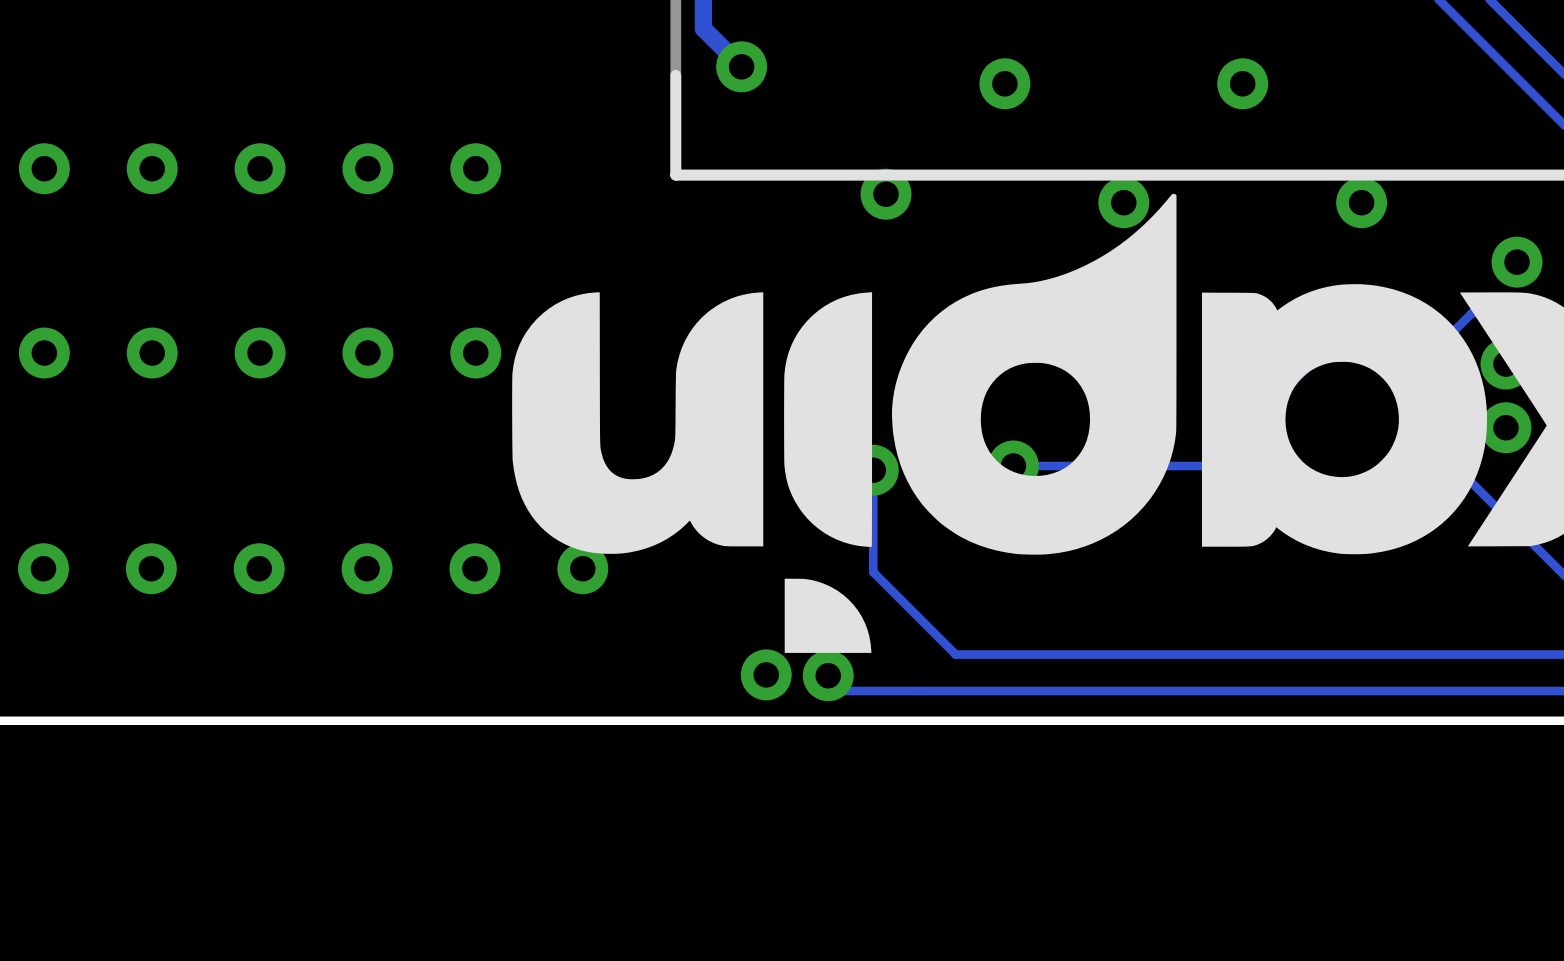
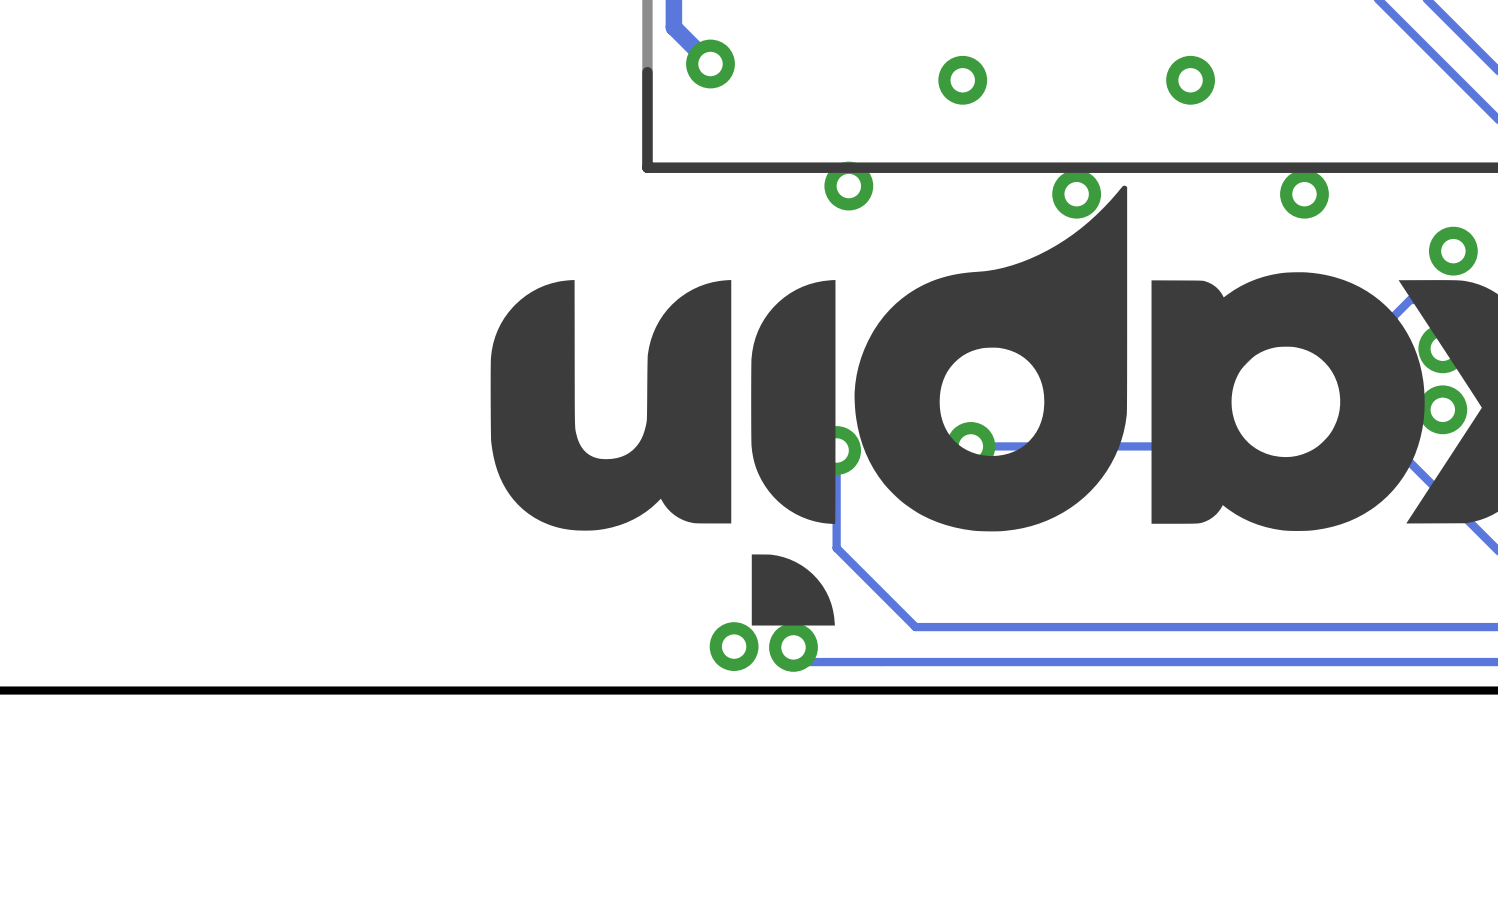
via: (44, 168) -> none
via: (152, 168) -> none
via: (260, 168) -> none
via: (367, 168) -> none
via: (475, 168) -> none
via: (44, 353) -> none
via: (152, 353) -> none
via: (260, 353) -> none
via: (367, 353) -> none
via: (475, 353) -> none
via: (43, 568) -> none
via: (151, 568) -> none
via: (259, 568) -> none
via: (367, 568) -> none
via: (474, 568) -> none
via: (582, 568) -> none

